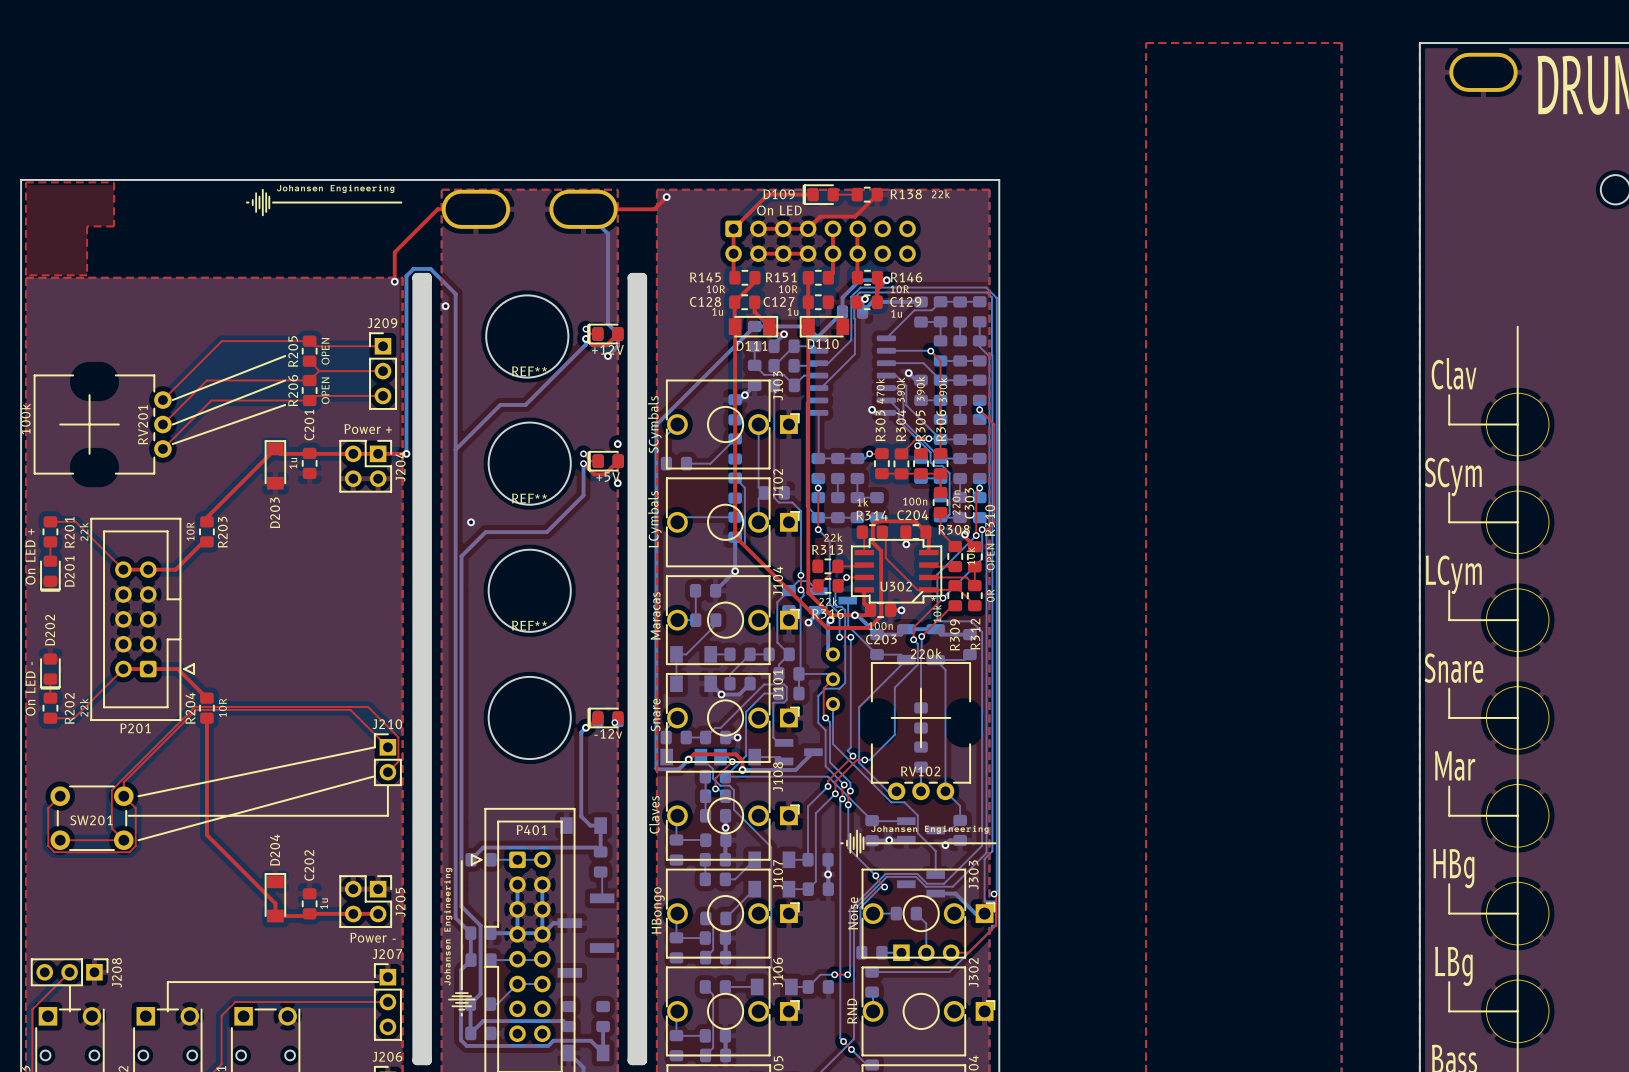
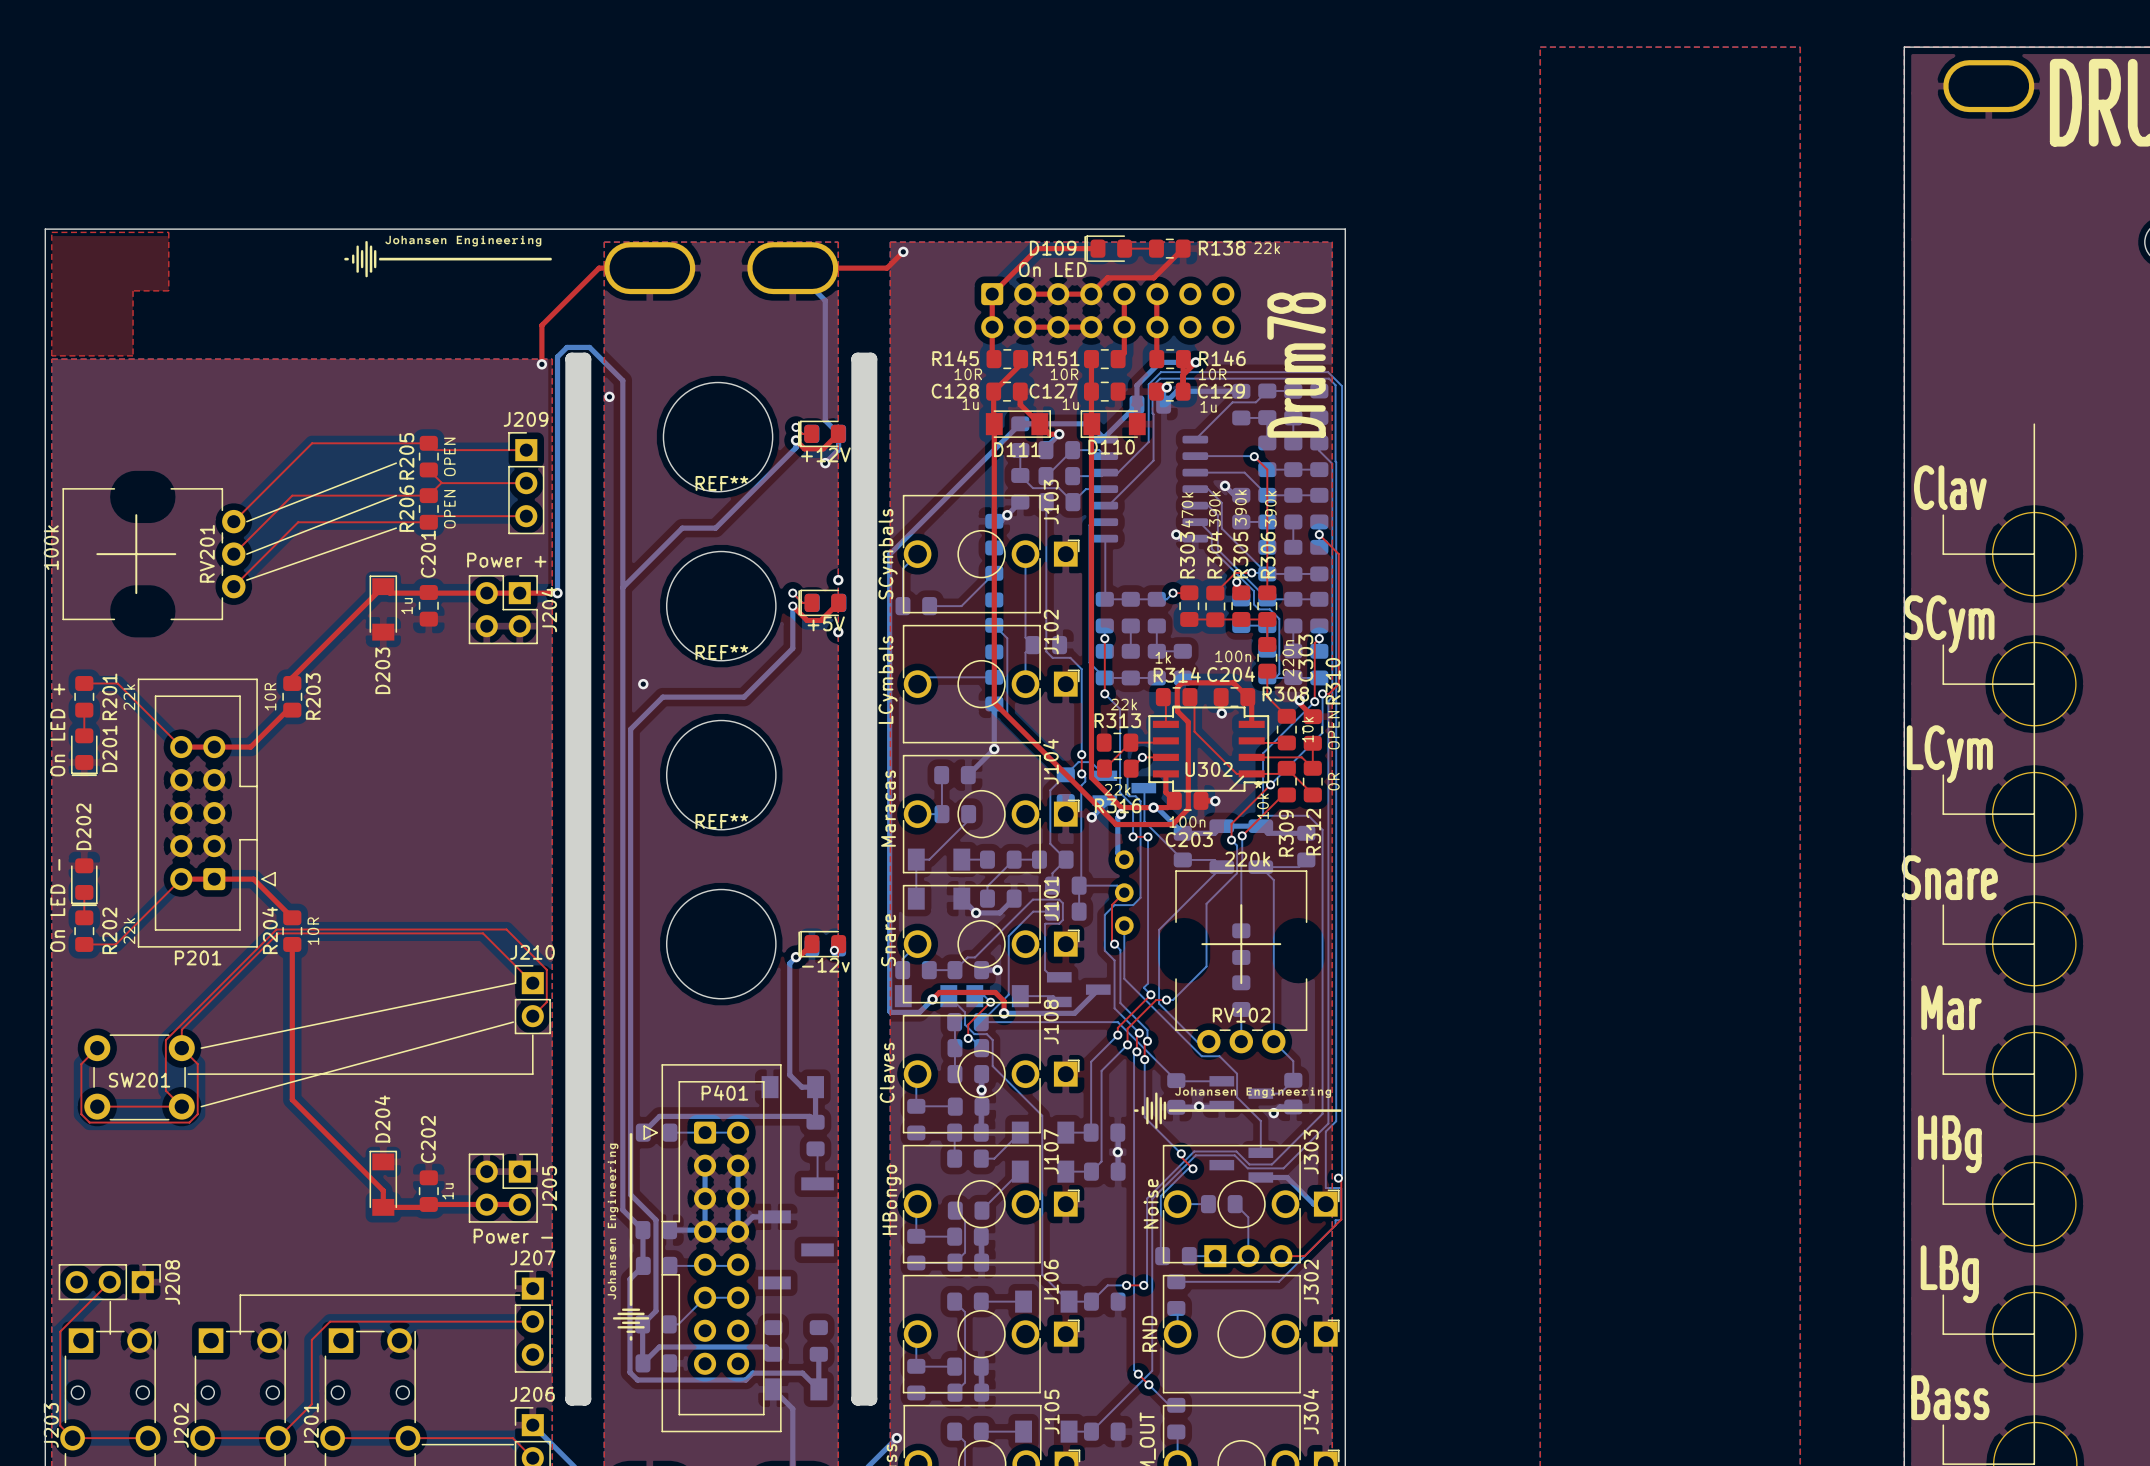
text: none -> Drum78 (1296, 365)

